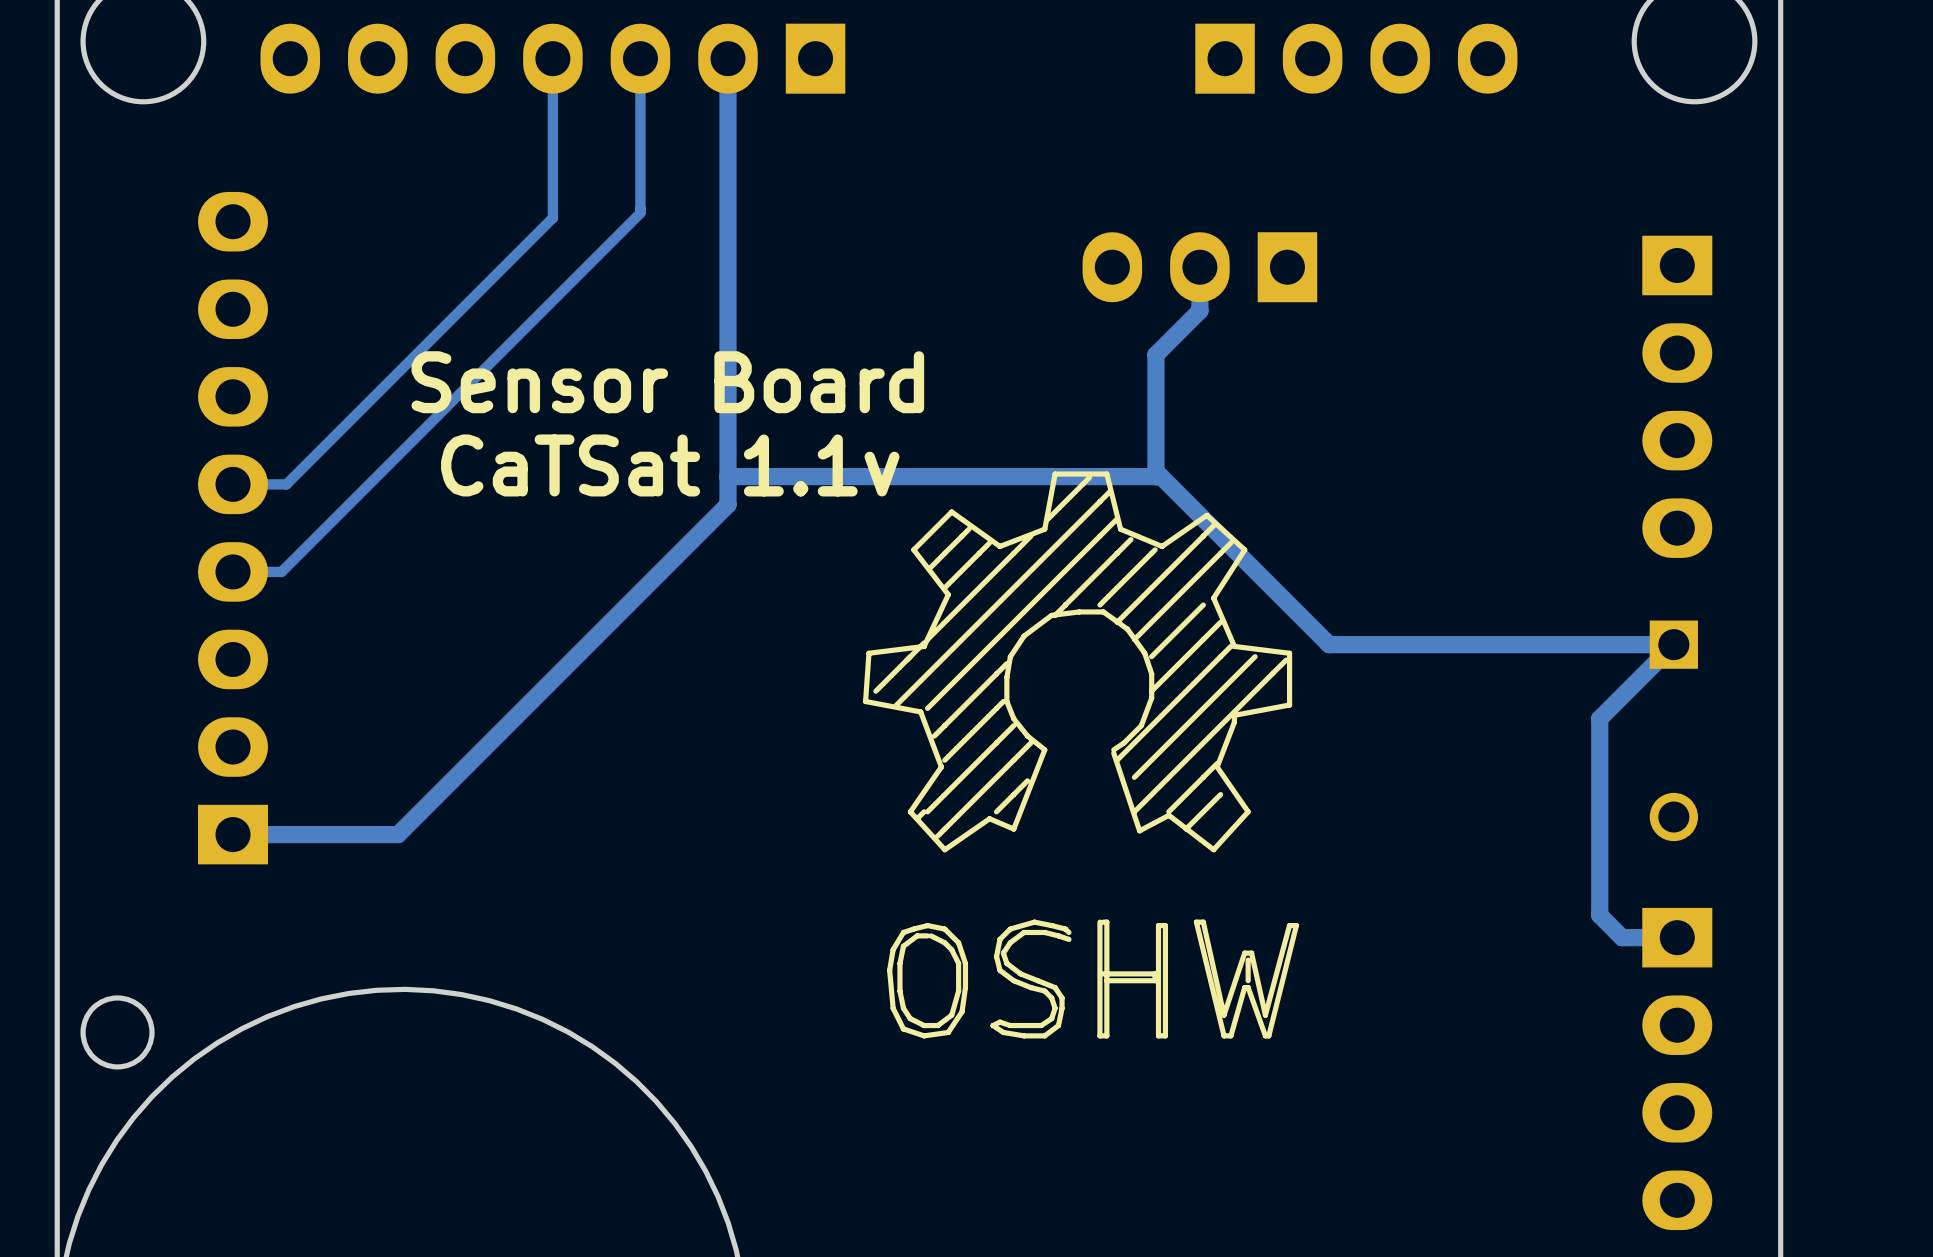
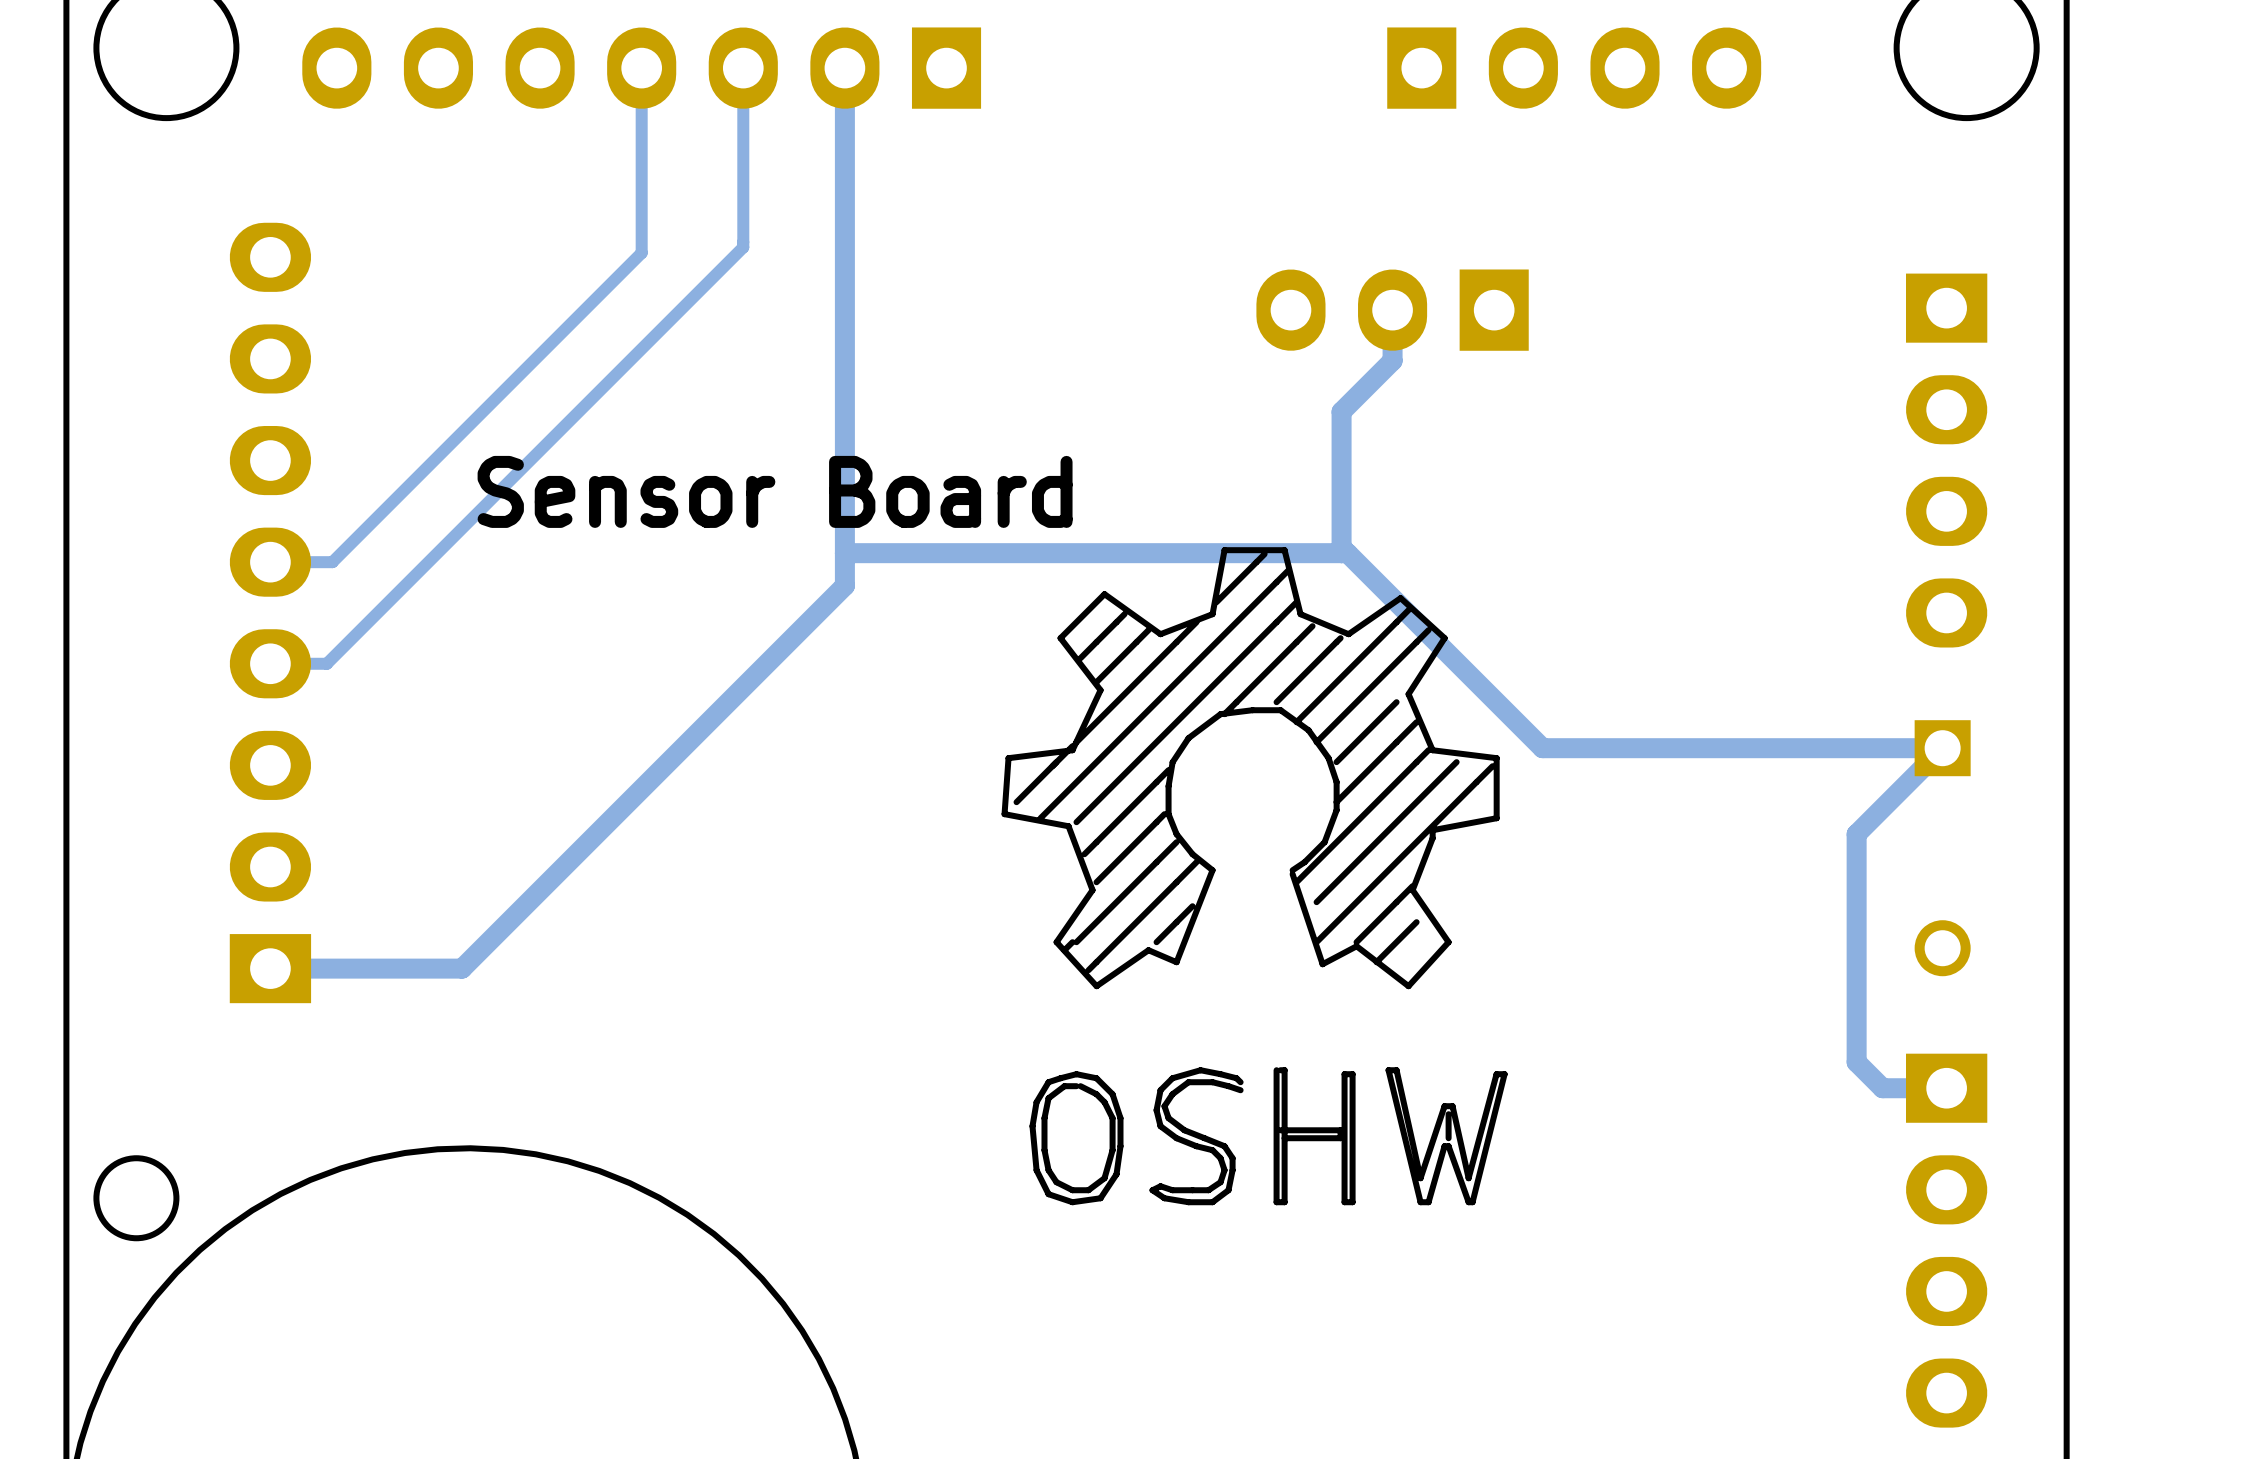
text position: Sensor Board (667, 382) -> Sensor Board (775, 491)
text: CaTSat 1.1v (670, 465) -> none

